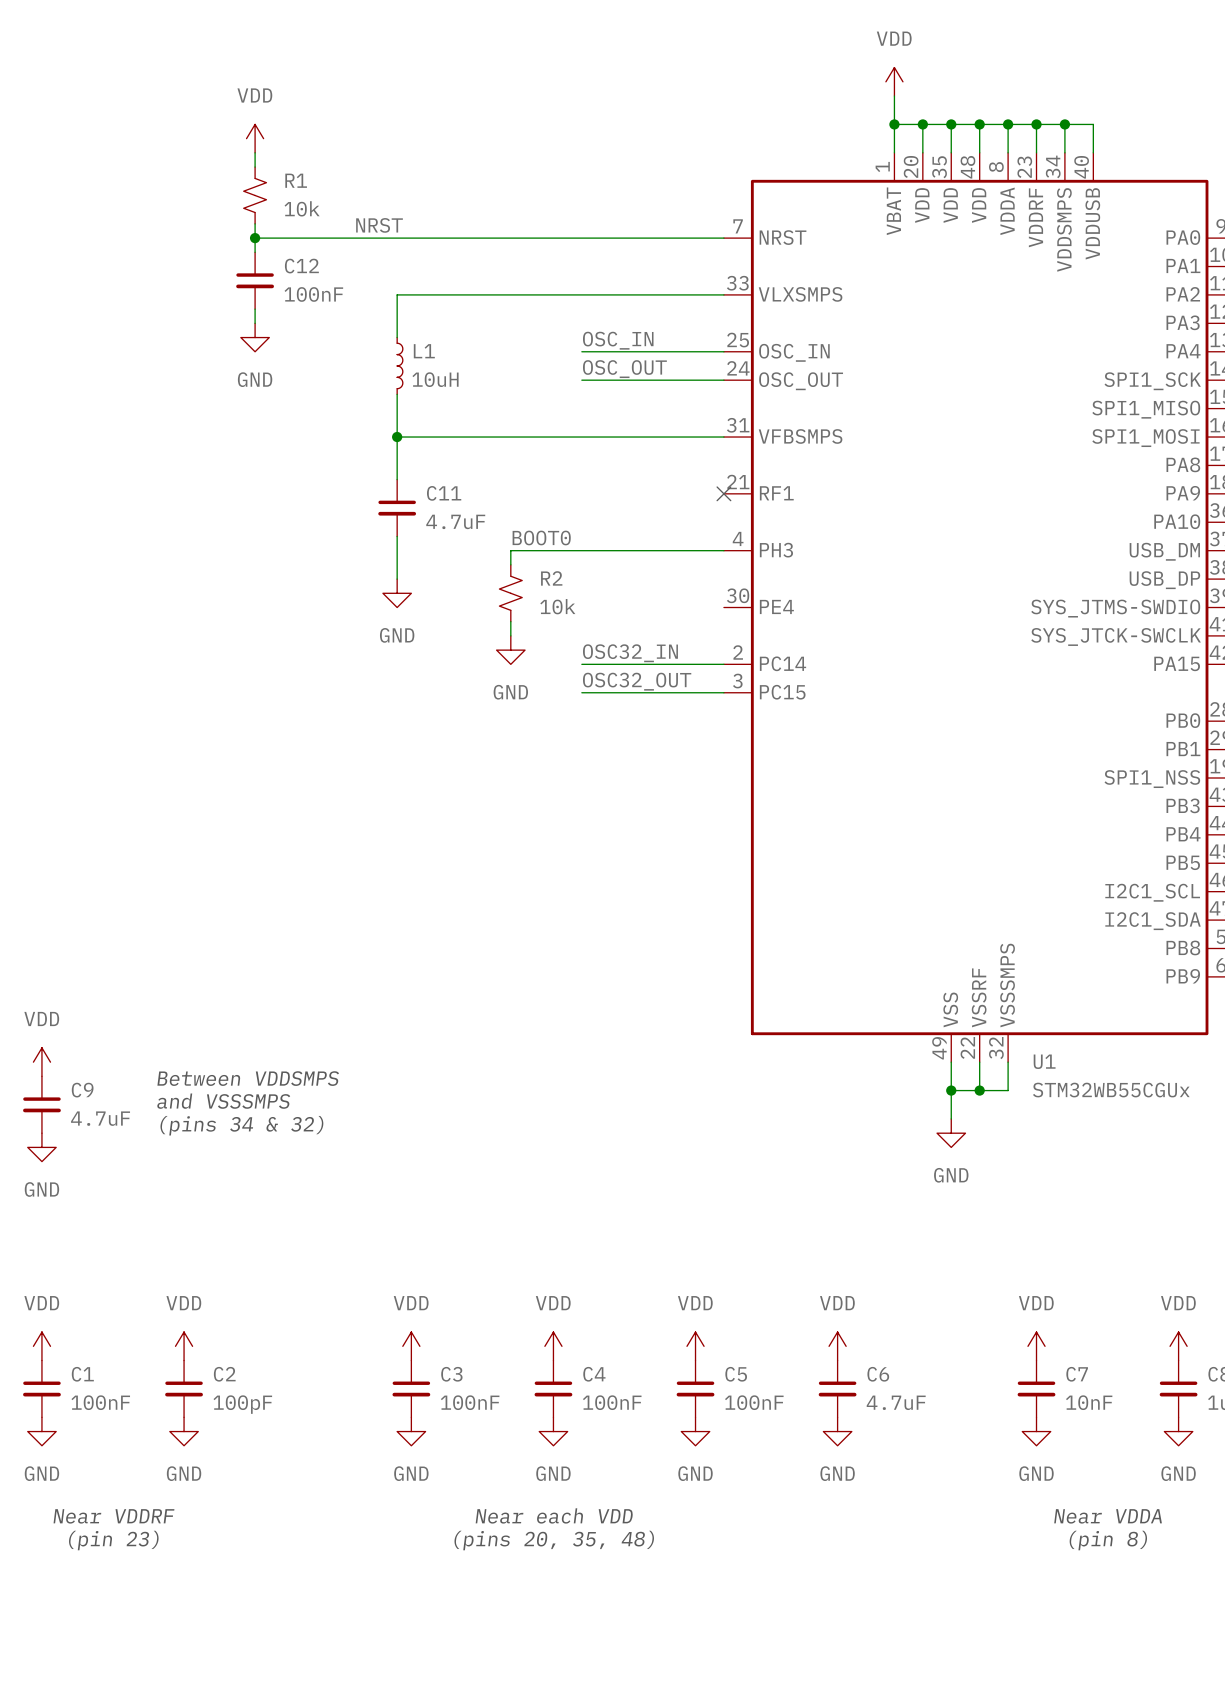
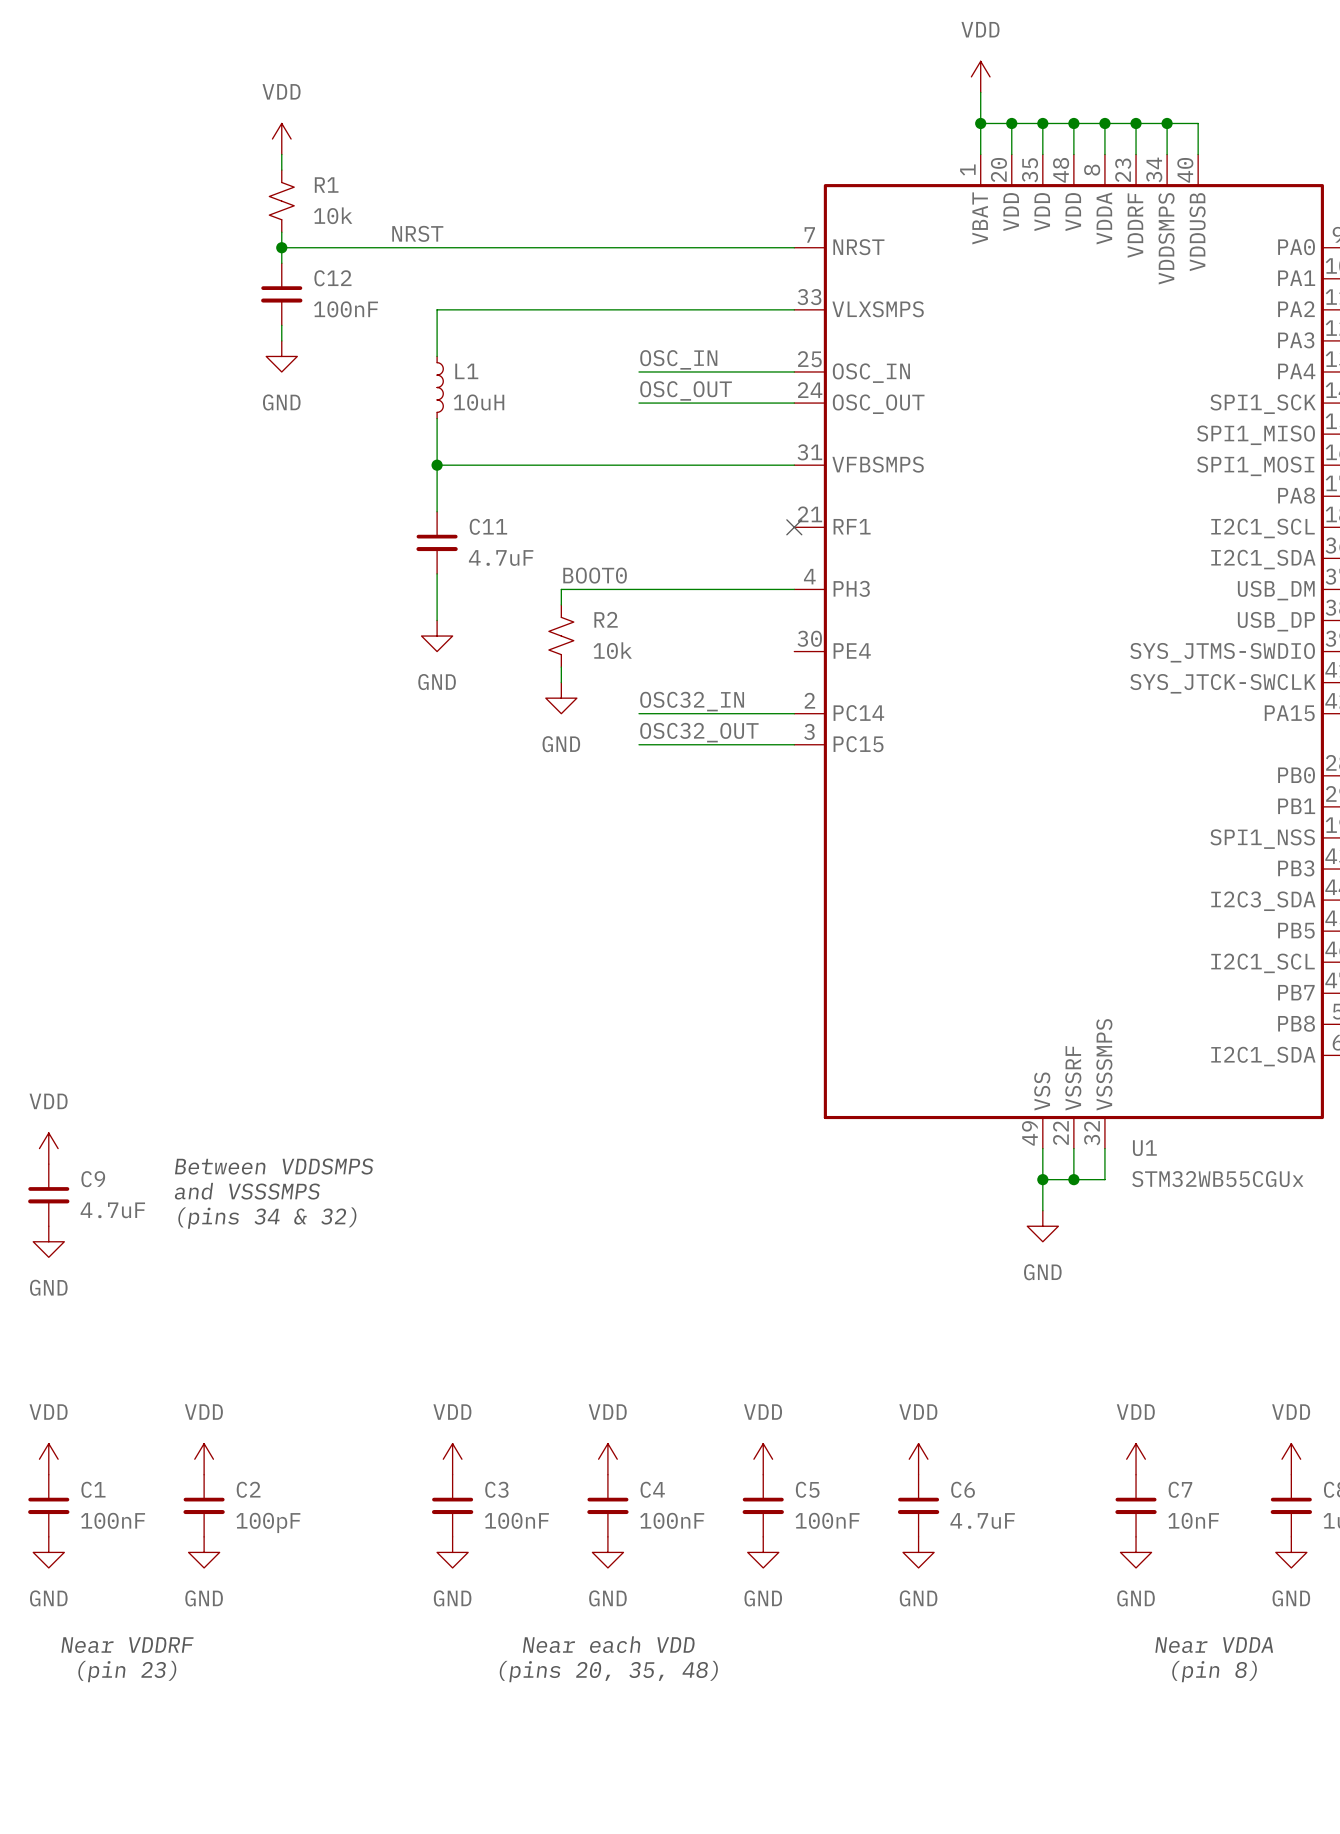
U1 pin name: PA9 (1183, 493) -> I2C1_SCL (1262, 528)
U1 pin name: PA10 (1177, 521) -> I2C1_SDA (1263, 559)
U1 pin name: PB4 (1183, 834) -> I2C3_SDA (1263, 901)
U1 pin name: I2C1_SDA (1153, 921) -> PB7 (1296, 992)
U1 pin name: PB9 (1183, 976) -> I2C1_SDA (1263, 1056)

